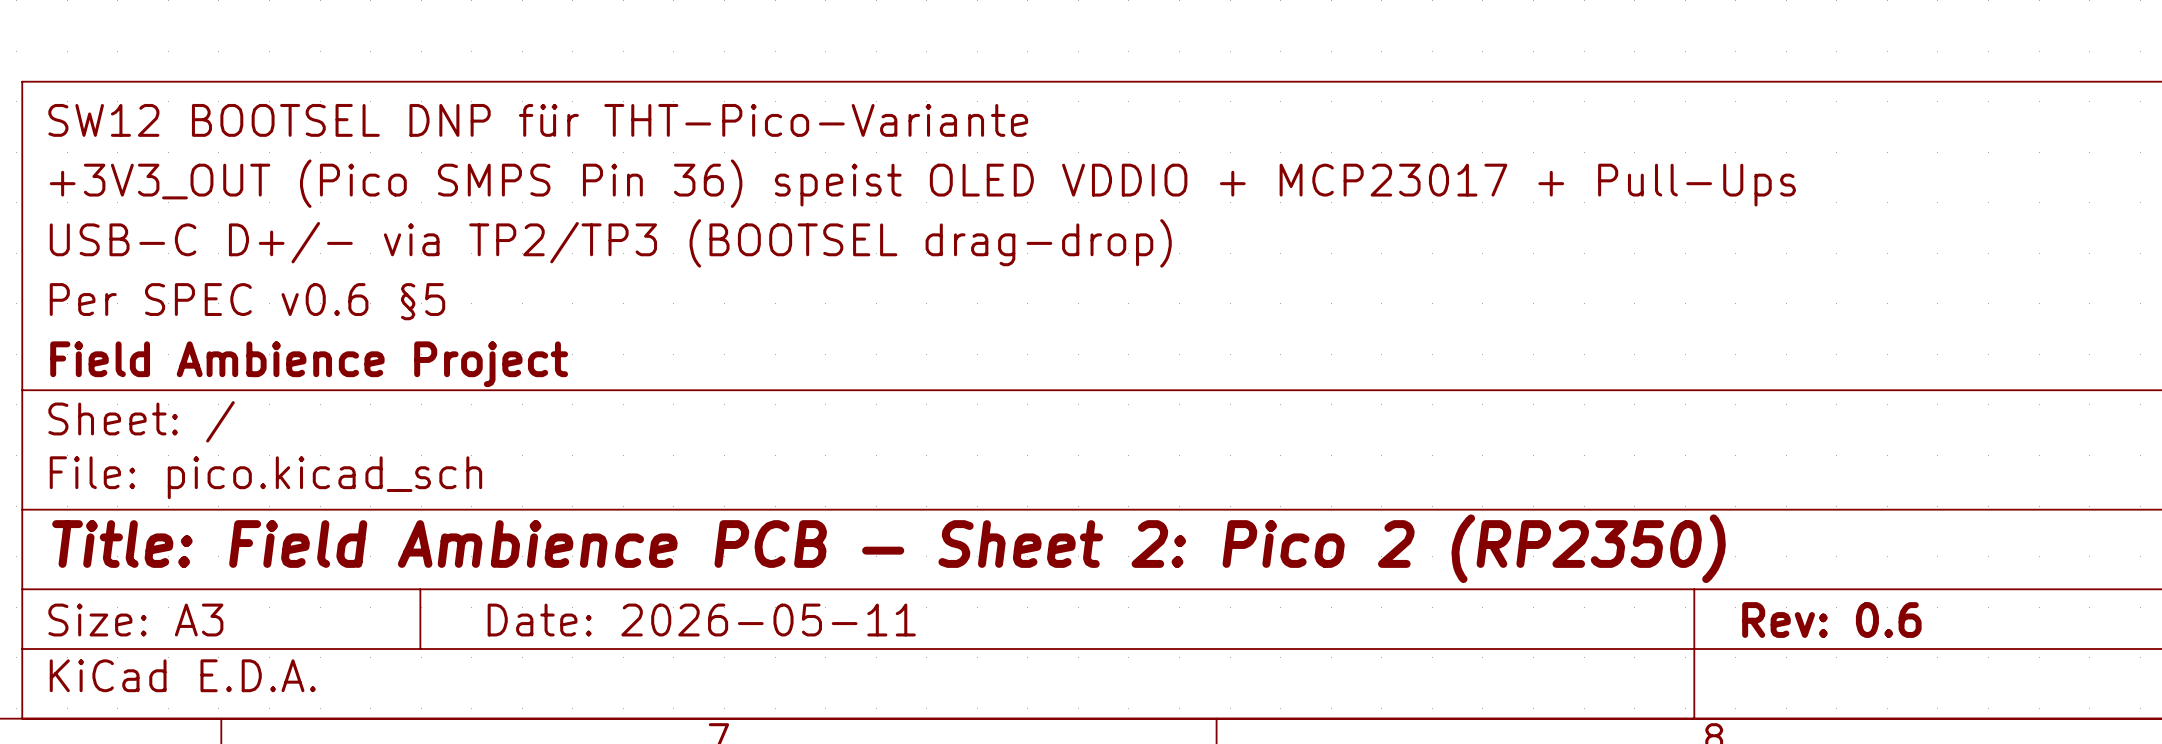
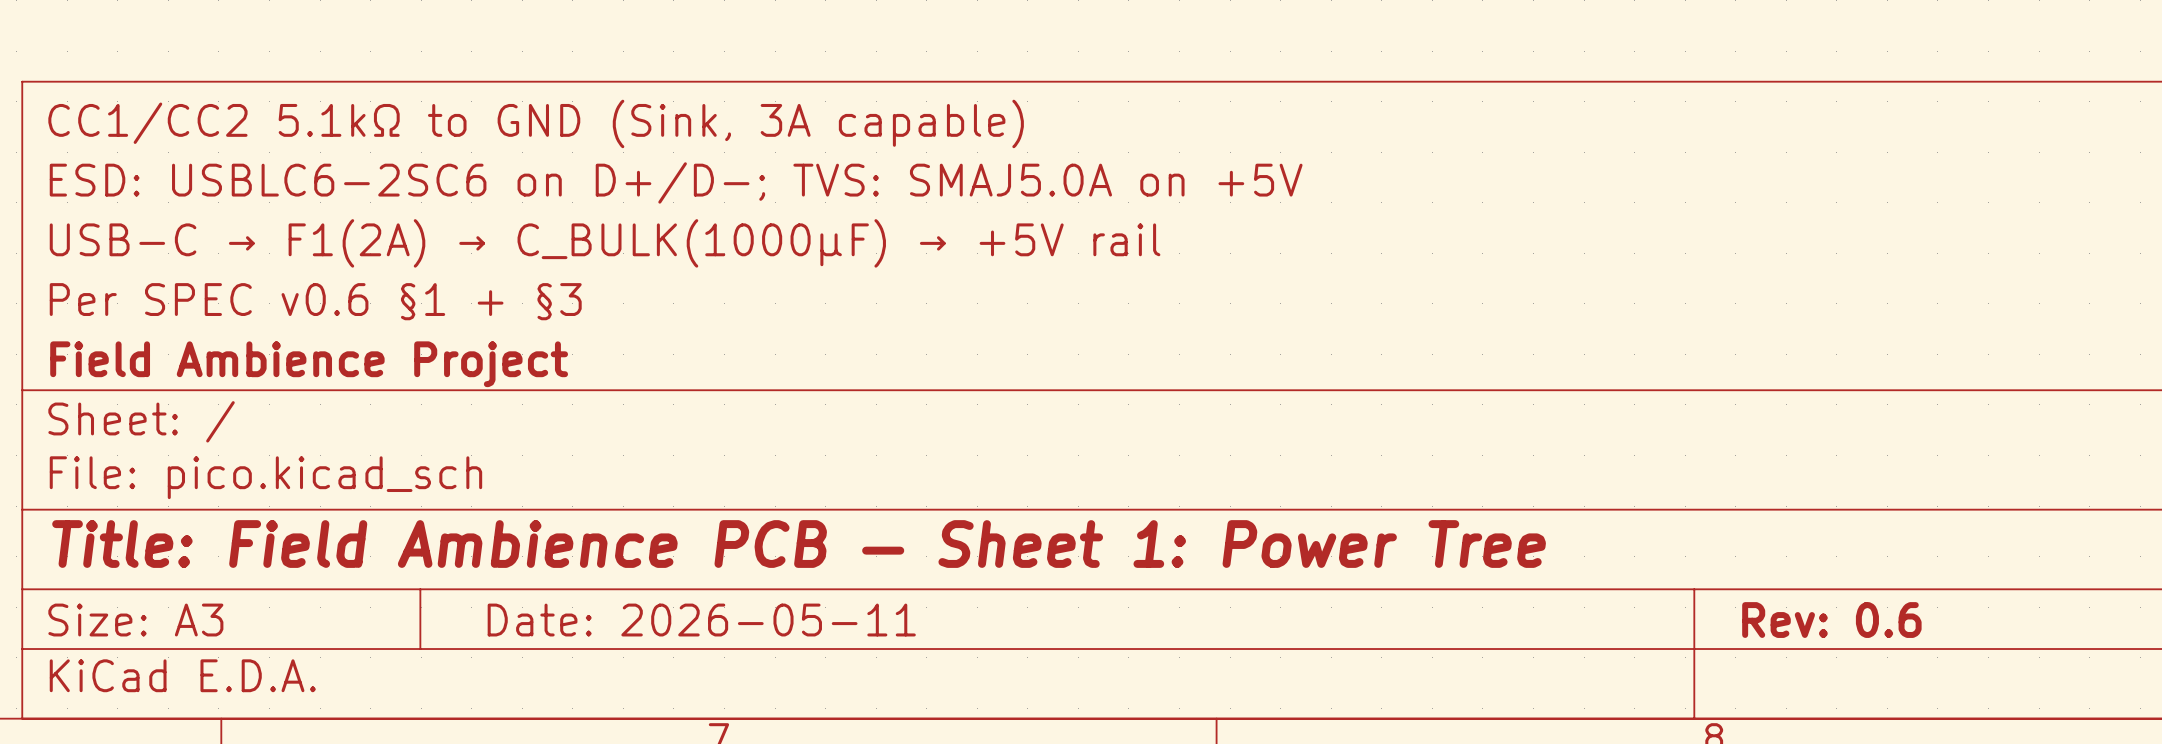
title block: SW12 BOOTSEL DNP für THT-Pico-Variante (538, 120) -> CC1/CC2 5.1kΩ to GND (Sink, 3A capable) (536, 123)
title block: +3V3_OUT (Pico SMPS Pin 36) speist OLED VDDIO + MCP23017 + Pull-Ups (922, 183) -> ESD: USBLC6-2SC6 on D+/D-; TVS: SMAJ5.0A on +5V (676, 182)
title block: USB-C D+/- via TP2/TP3 (BOOTSEL drag-drop) (610, 243) -> USB-C → F1(2A) → C_BULK(1000µF) → +5V rail (605, 243)
title block: Per SPEC v0.6 §5 (247, 301) -> Per SPEC v0.6 §1 + §3 (315, 301)
title block: Title: Field Ambience PCB — Sheet 2: Pico 2 (RP2350) (888, 548) -> Title: Field Ambience PCB — Sheet 1: Power Tree (799, 544)

